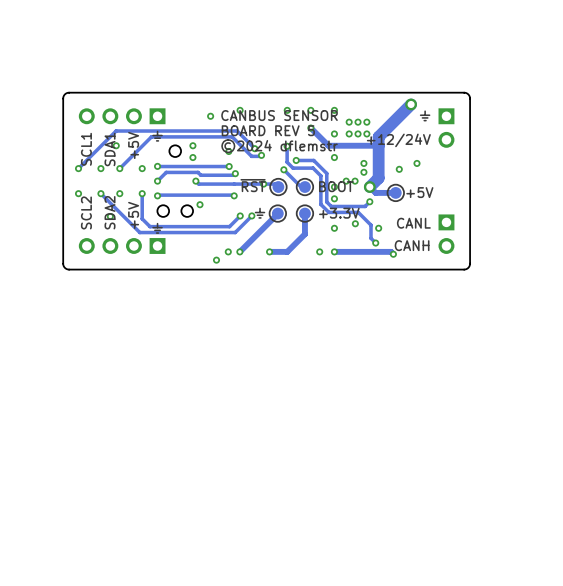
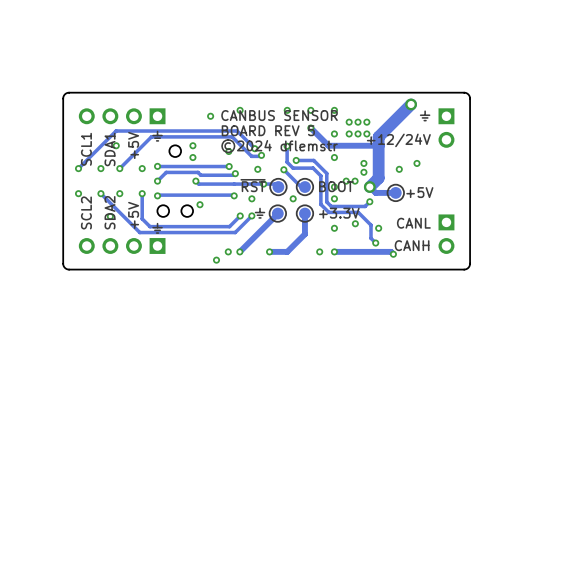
via: none -> (257, 169)
via: none -> (251, 198)
via: none -> (293, 198)

